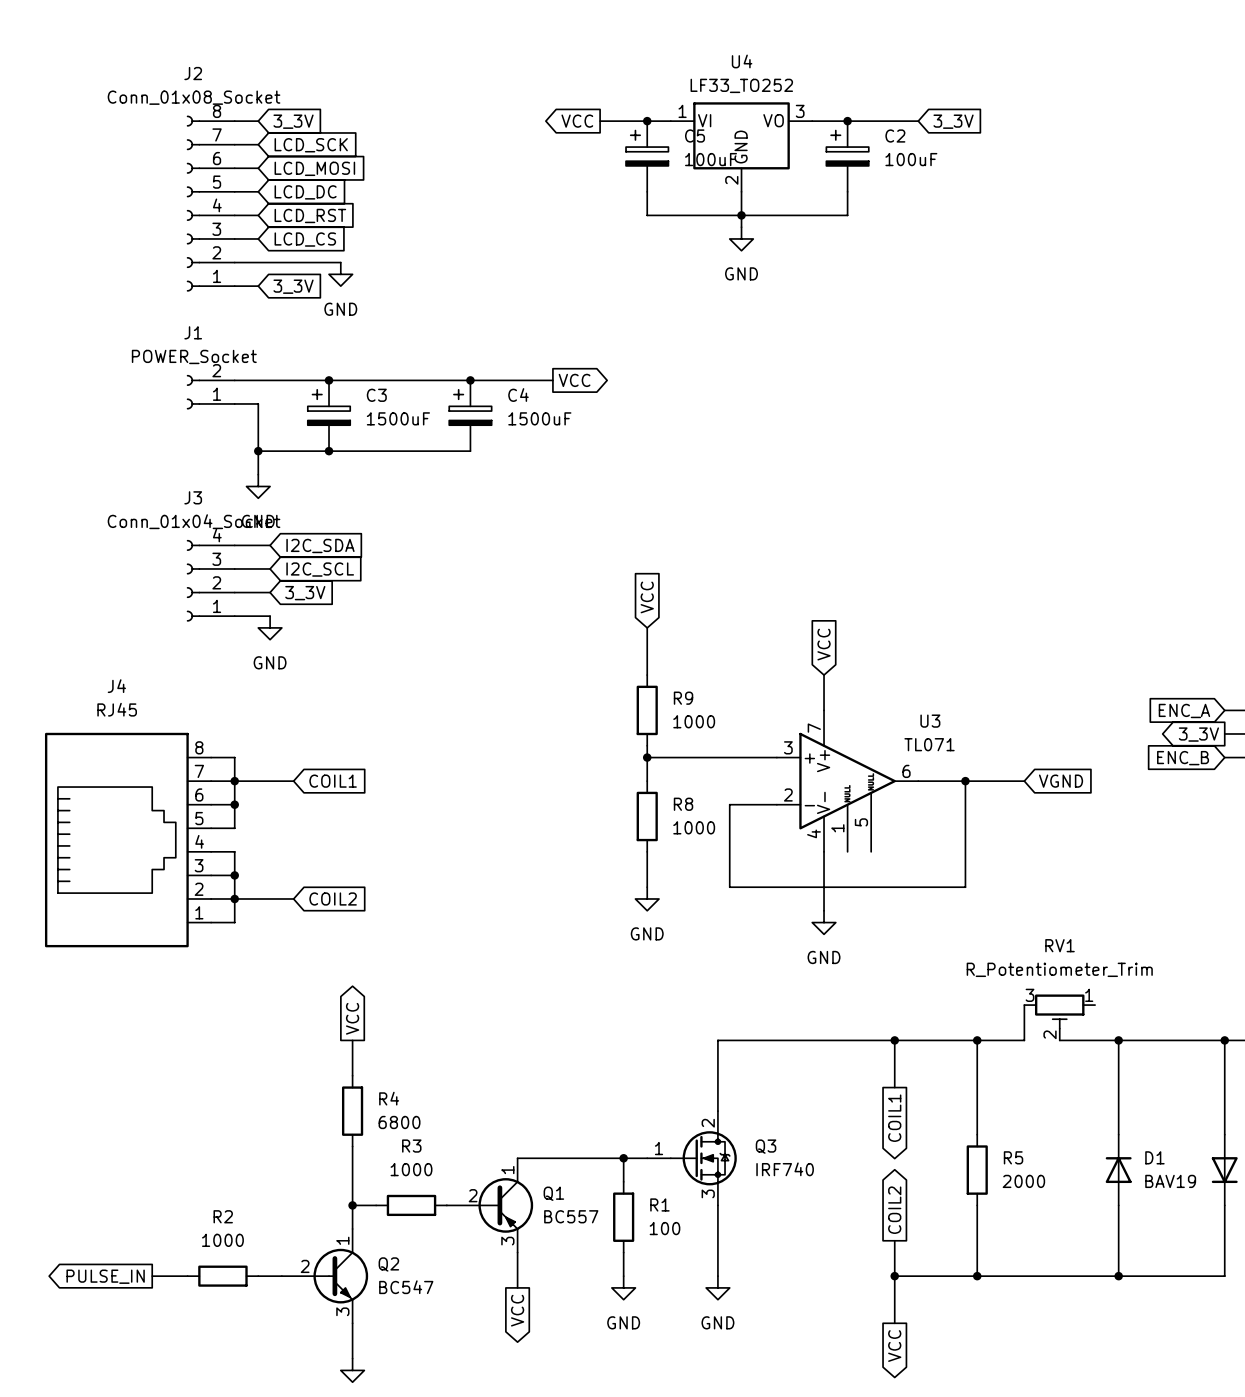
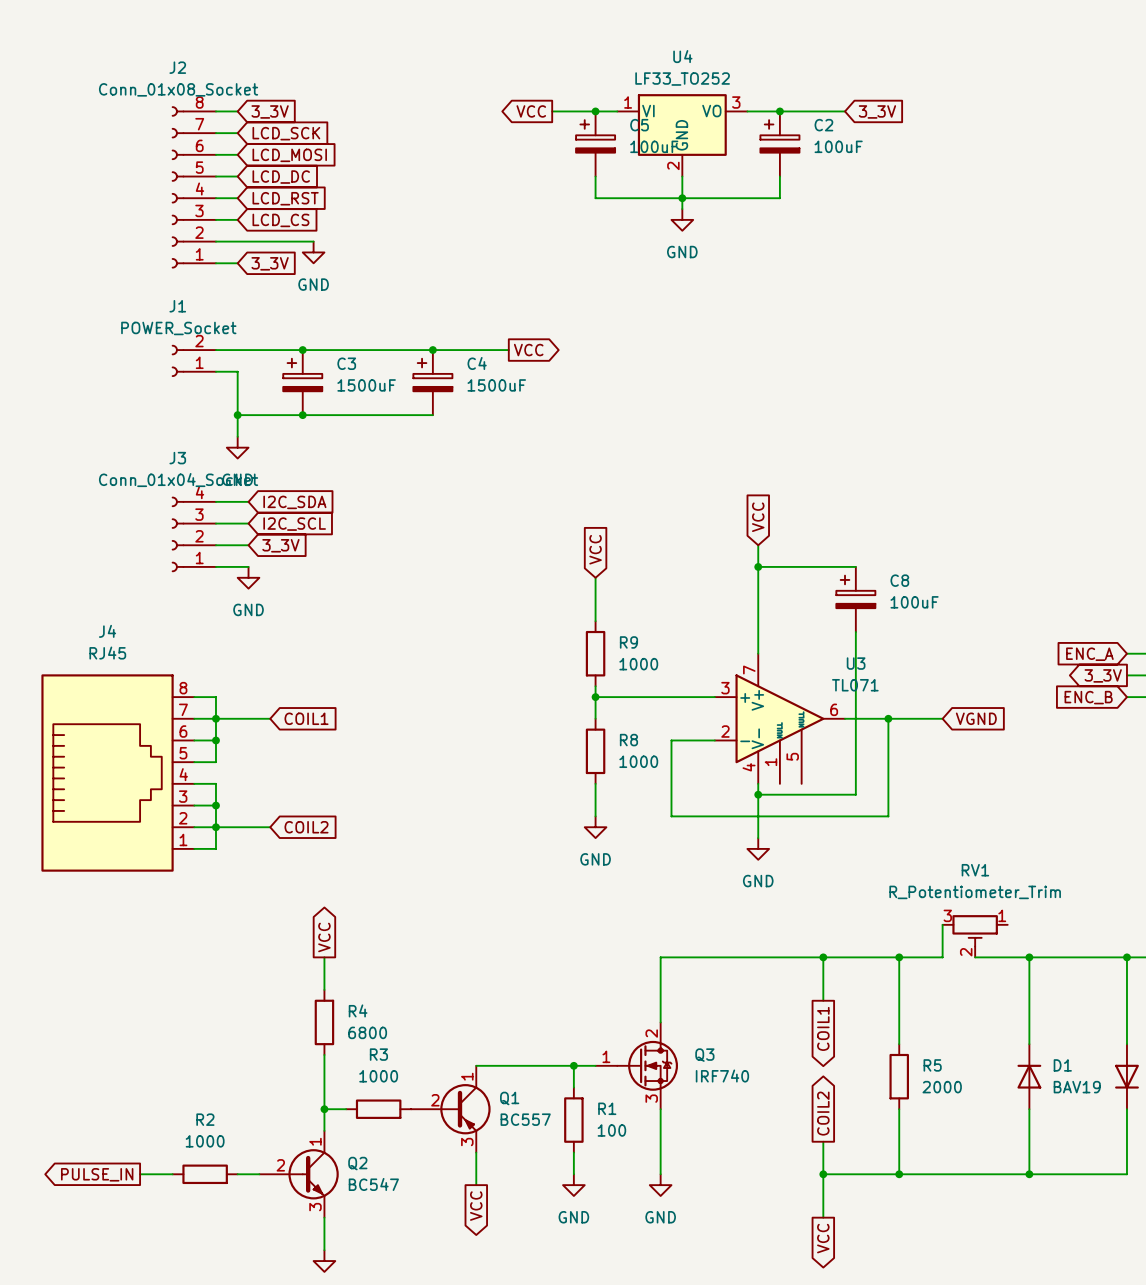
wire: none -> (758, 545) (758, 621)
wire: none -> (758, 566) (855, 566)
junction: none -> (758, 566)
global label position: VCC (824, 644) -> VCC (758, 517)
C8: none -> 100uF (855, 599)
wire: none -> (855, 632) (855, 794) (758, 794)
junction: none -> (758, 794)

